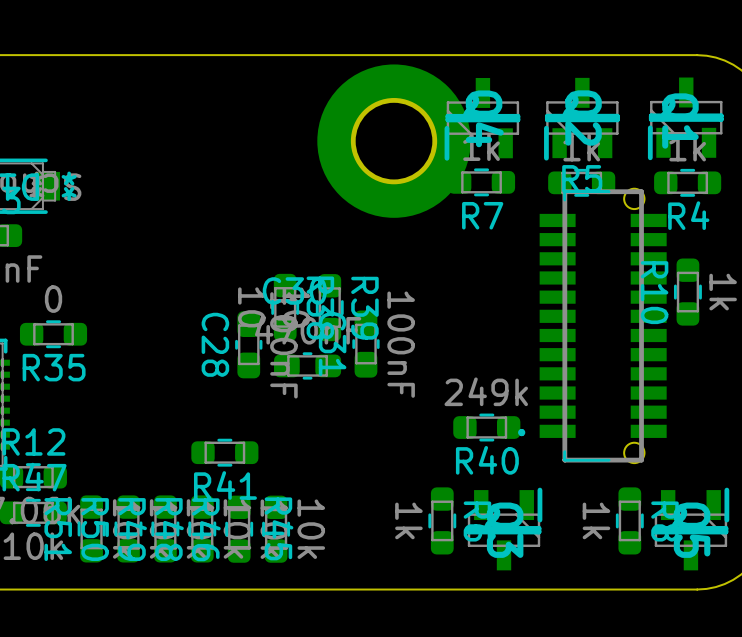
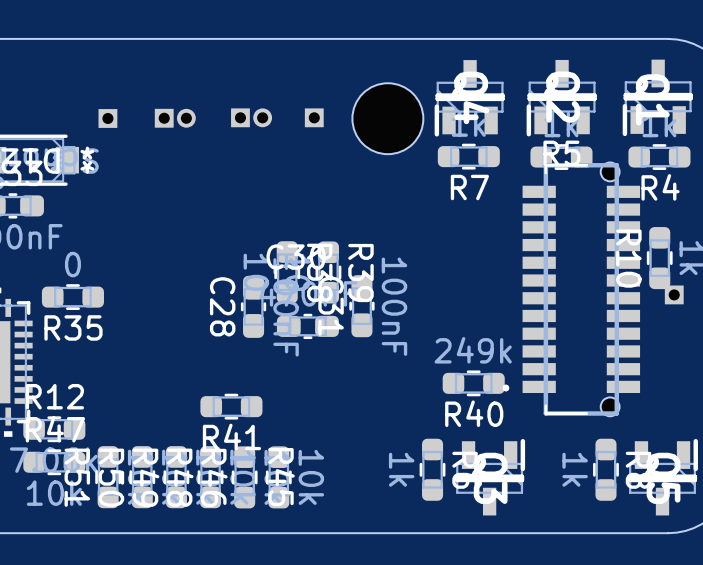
part footprint: [317, 64, 471, 218] -> [352, 83, 424, 155]
part: none -> (175, 118)
part: none -> (251, 117)
part: none -> (314, 117)
part: none -> (107, 118)
part: none -> (674, 294)

